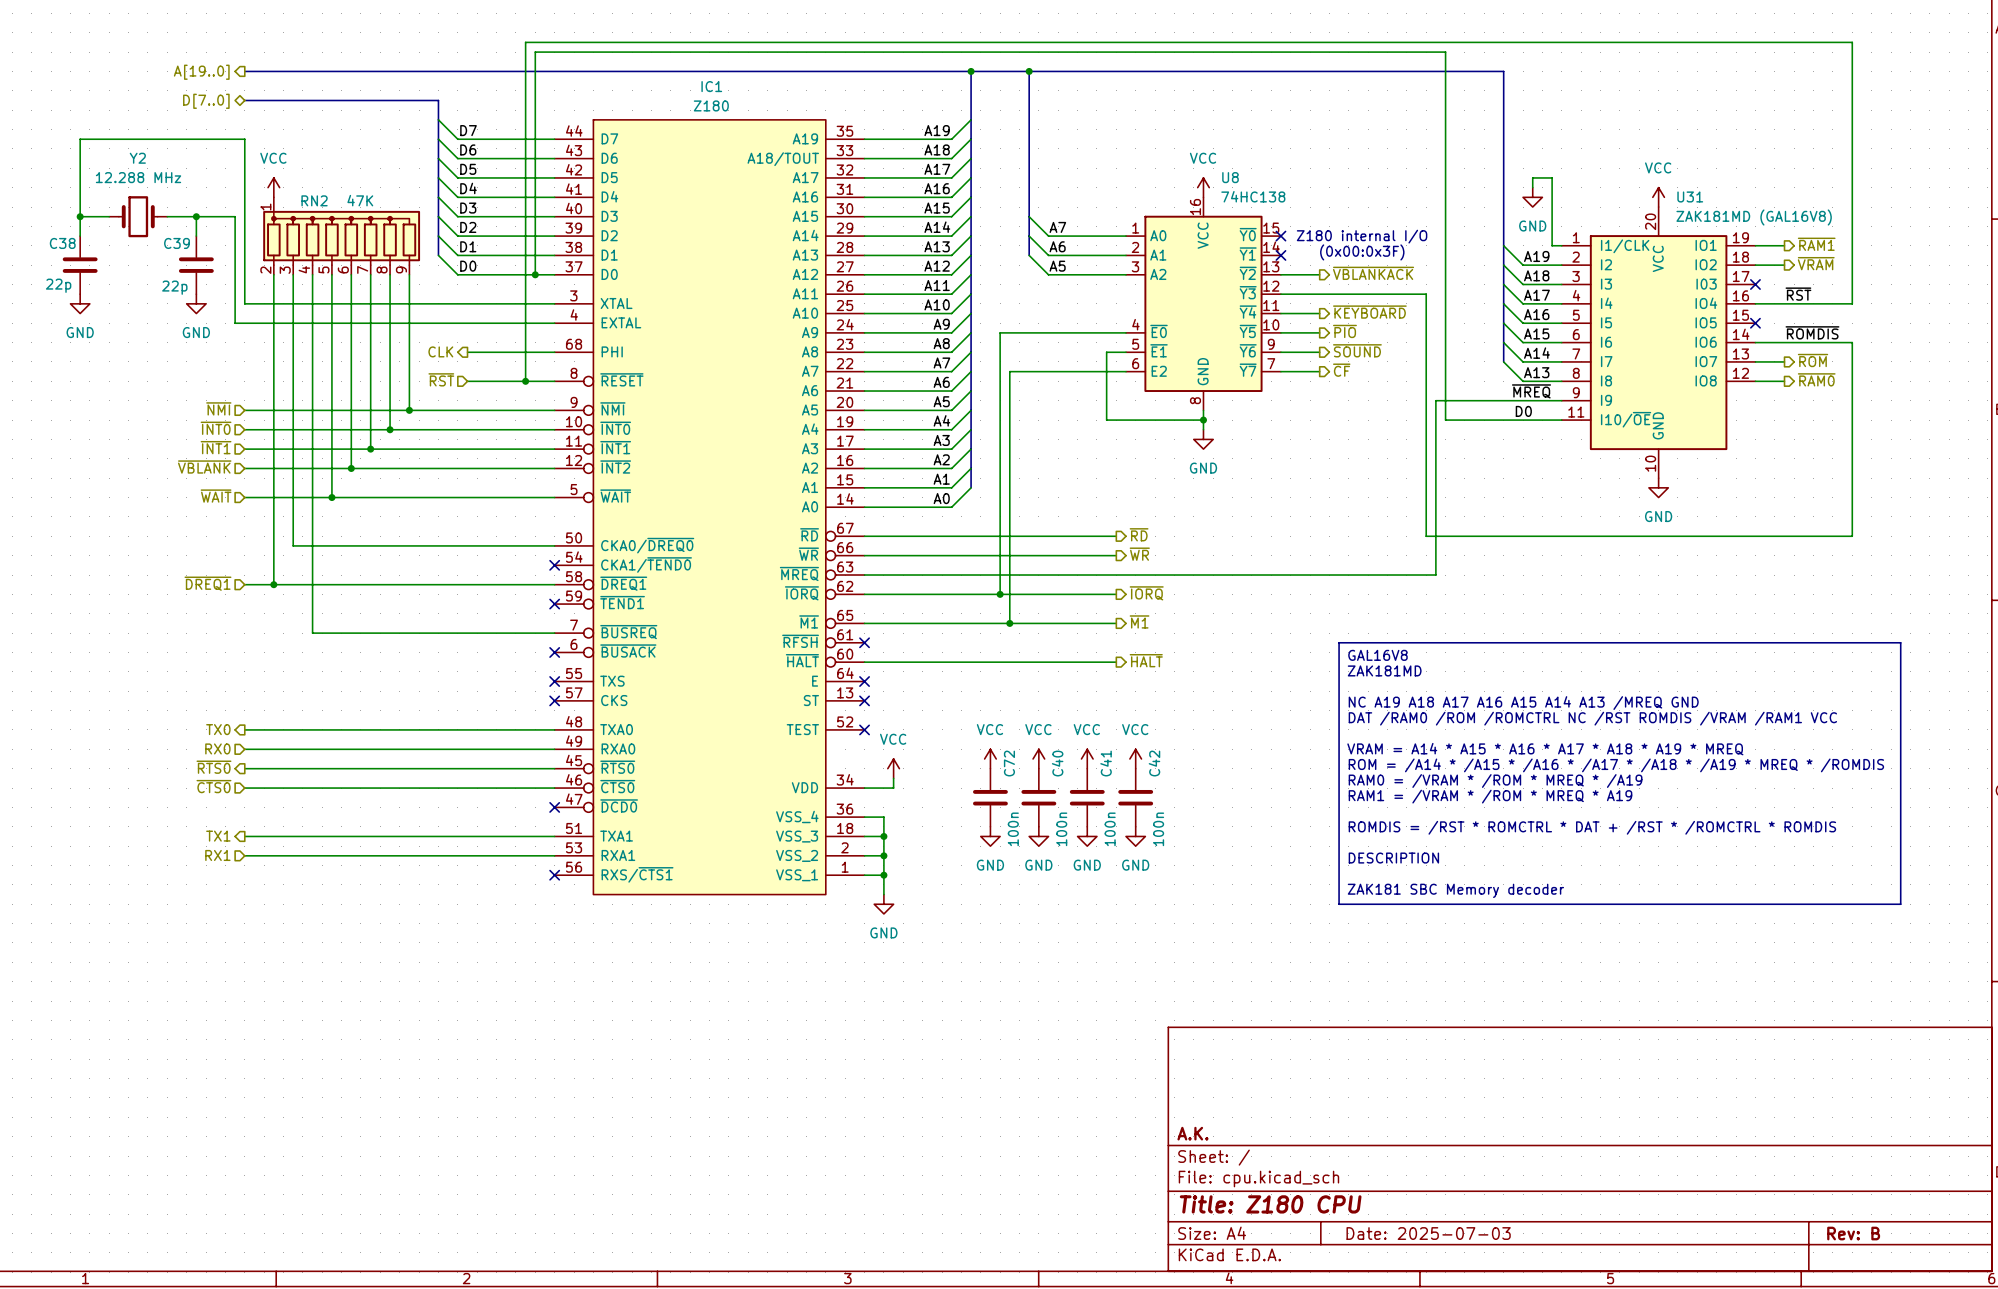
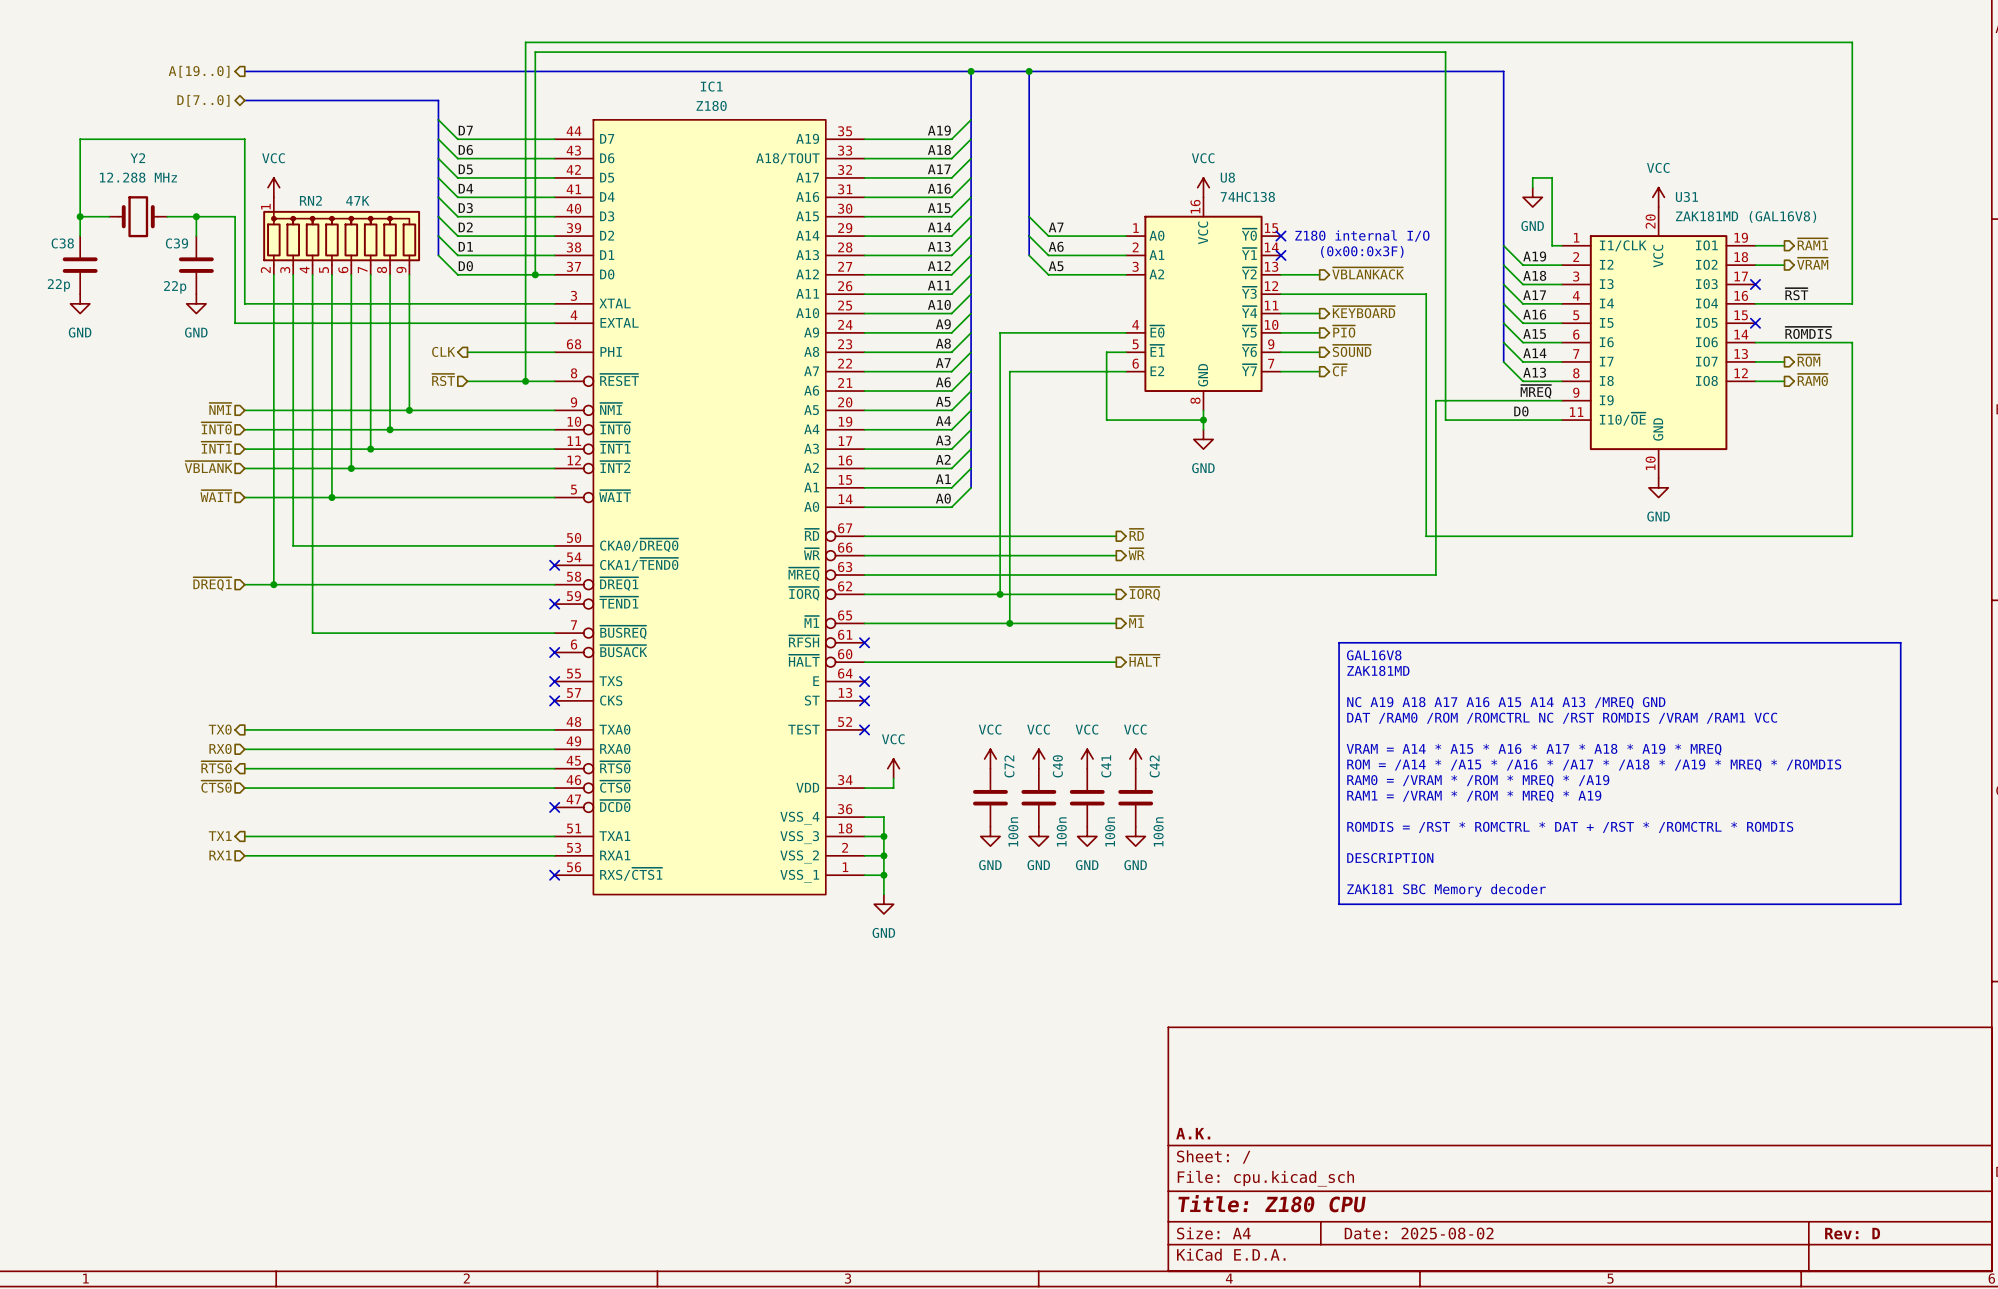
title block: Date: 2025-07-03 (1428, 1233) -> Date: 2025-08-02 (1419, 1233)
title block: Rev: B (1853, 1233) -> Rev: D (1852, 1233)

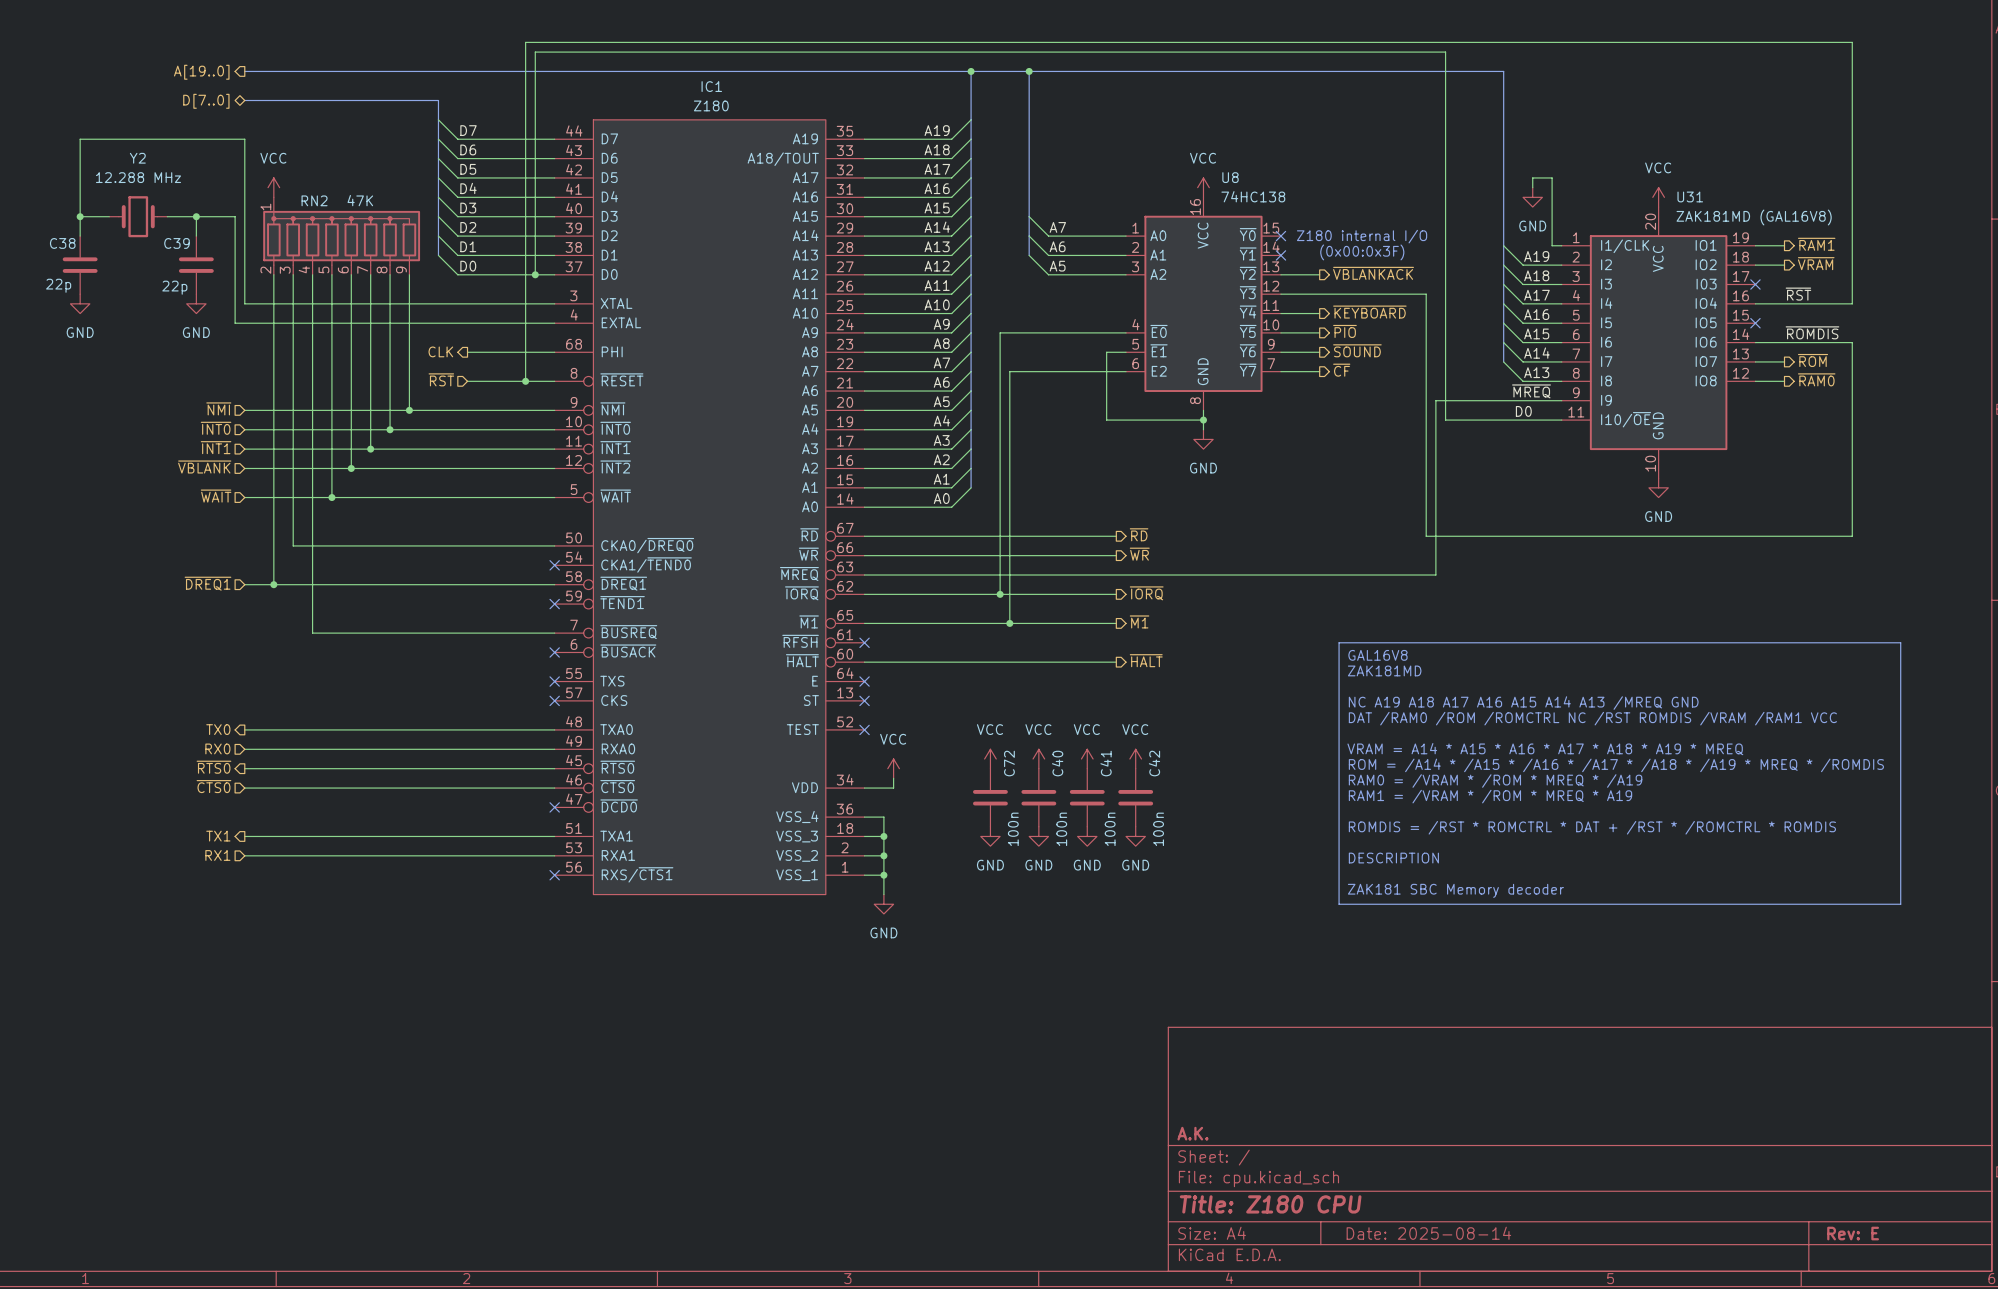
title block: Date: 2025-08-02 (1419, 1233) -> Date: 2025-08-14 (1428, 1233)
title block: Rev: D (1852, 1233) -> Rev: E (1853, 1233)

